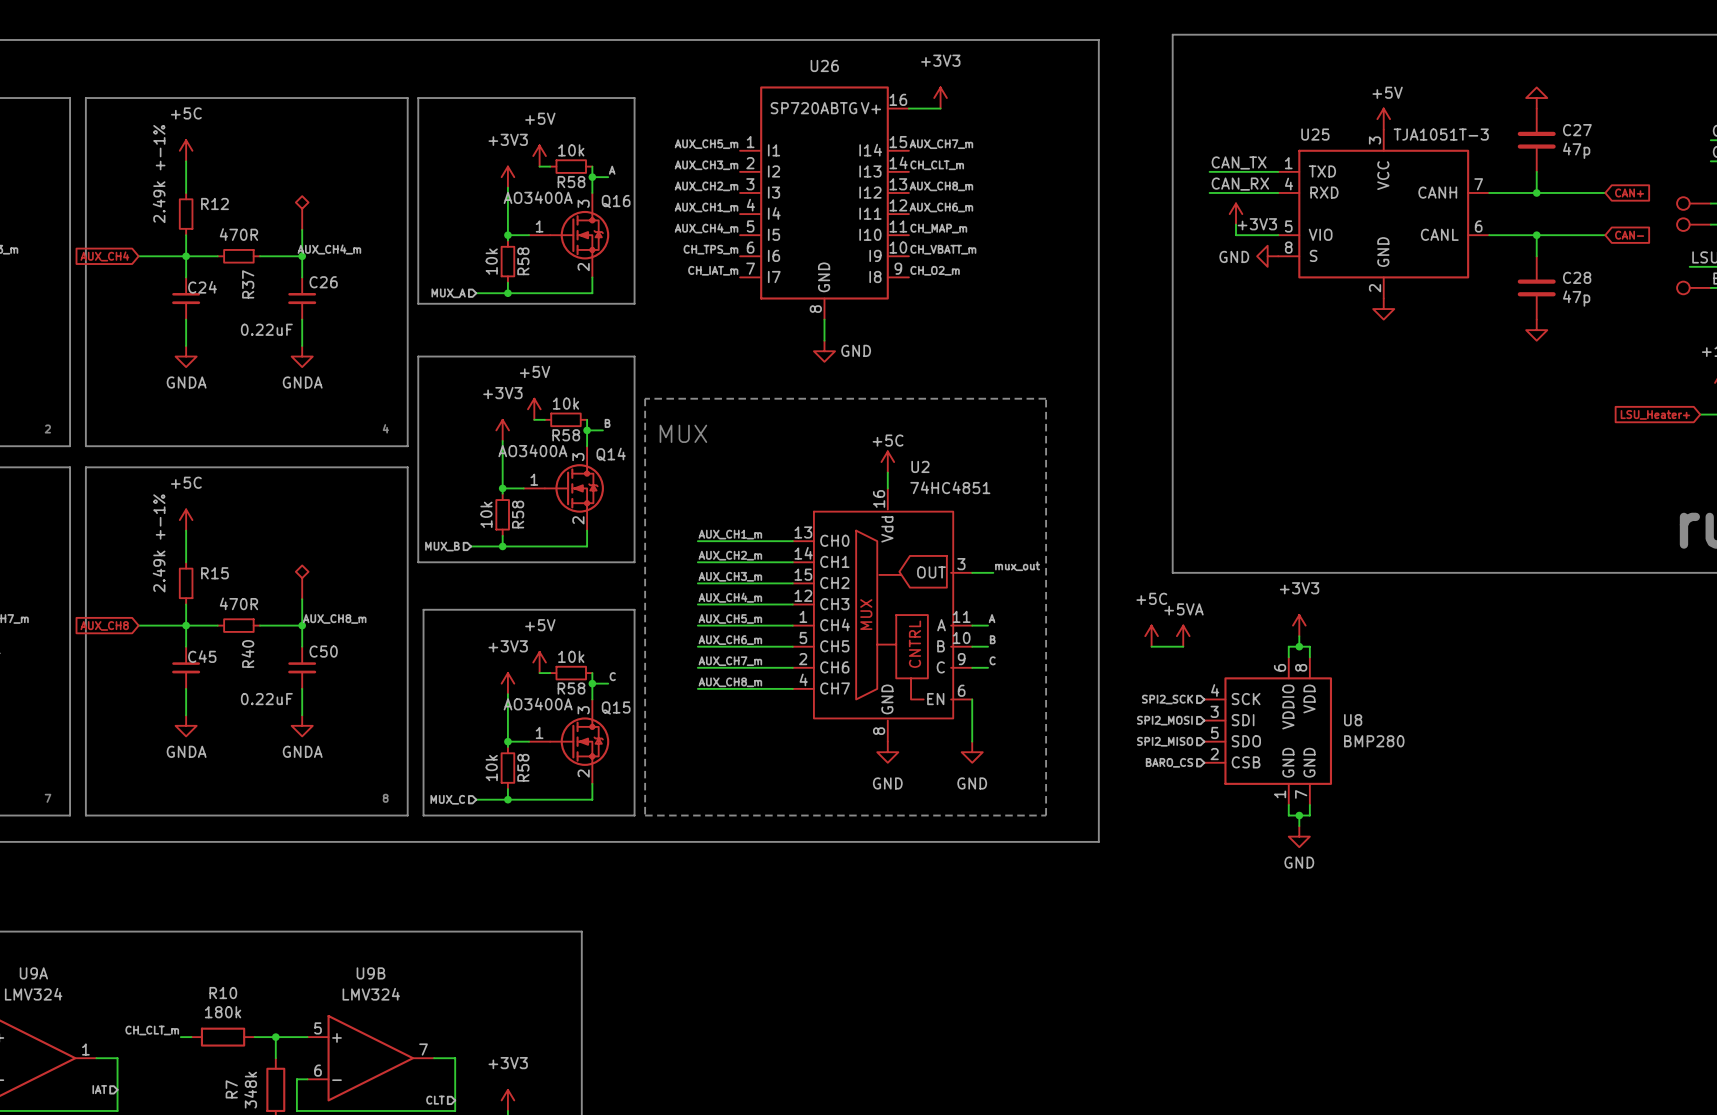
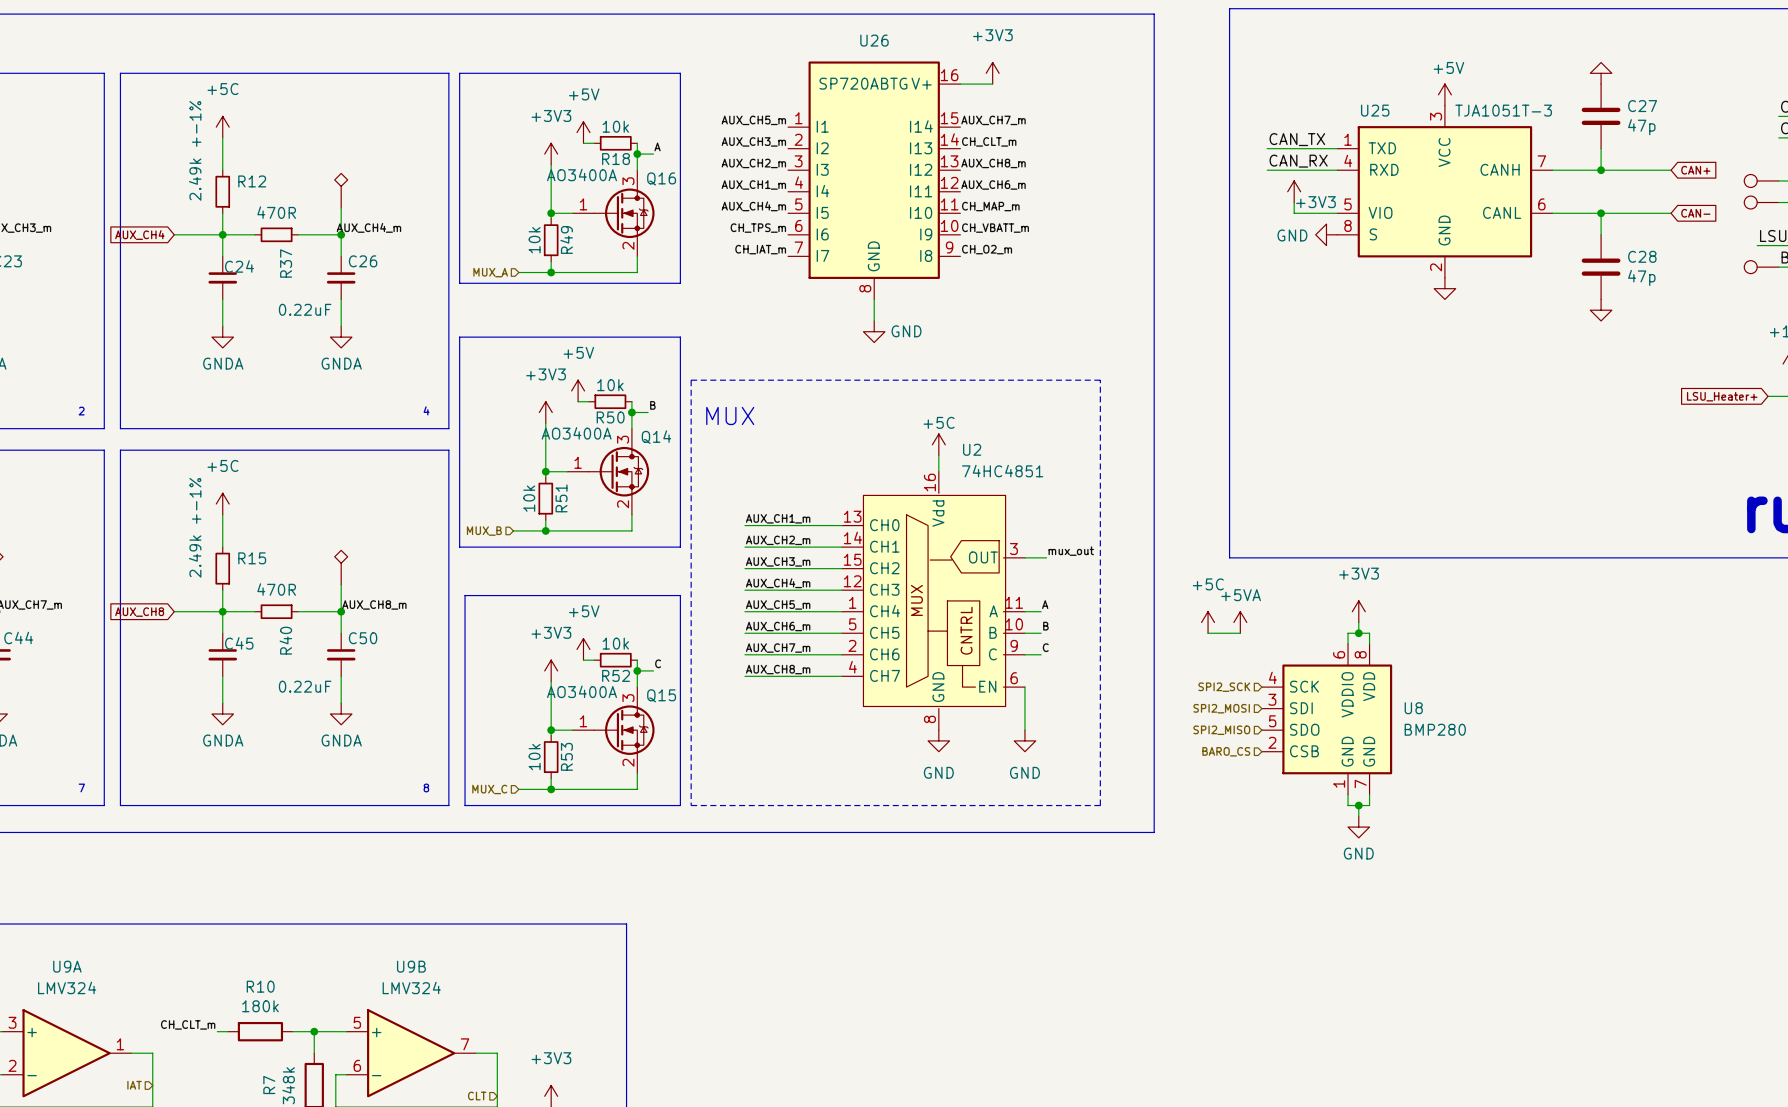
R58 name: R58 (571, 182) -> R18 (616, 159)
R58 name: R58 (523, 261) -> R49 (566, 239)
R58 name: R58 (566, 435) -> R50 (610, 417)
R58 name: R58 (518, 514) -> R51 (561, 498)
R58 name: R58 (571, 688) -> R52 (616, 675)
R58 name: R58 (523, 767) -> R53 (566, 756)

